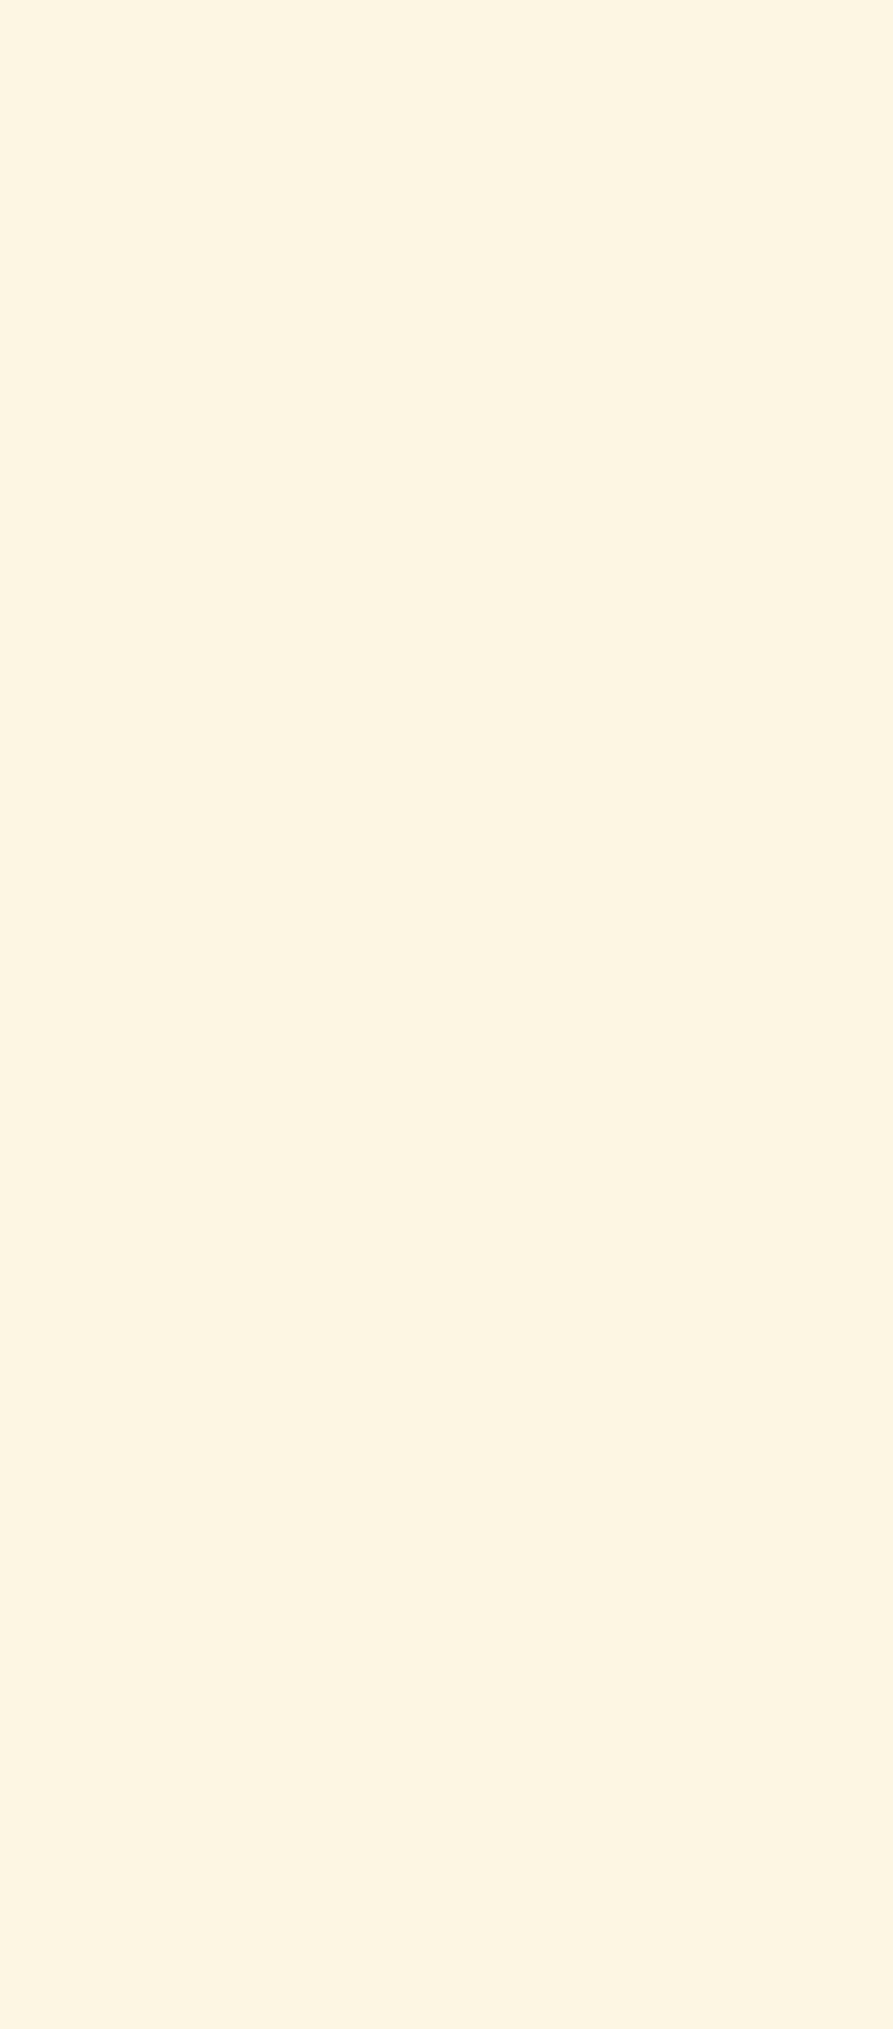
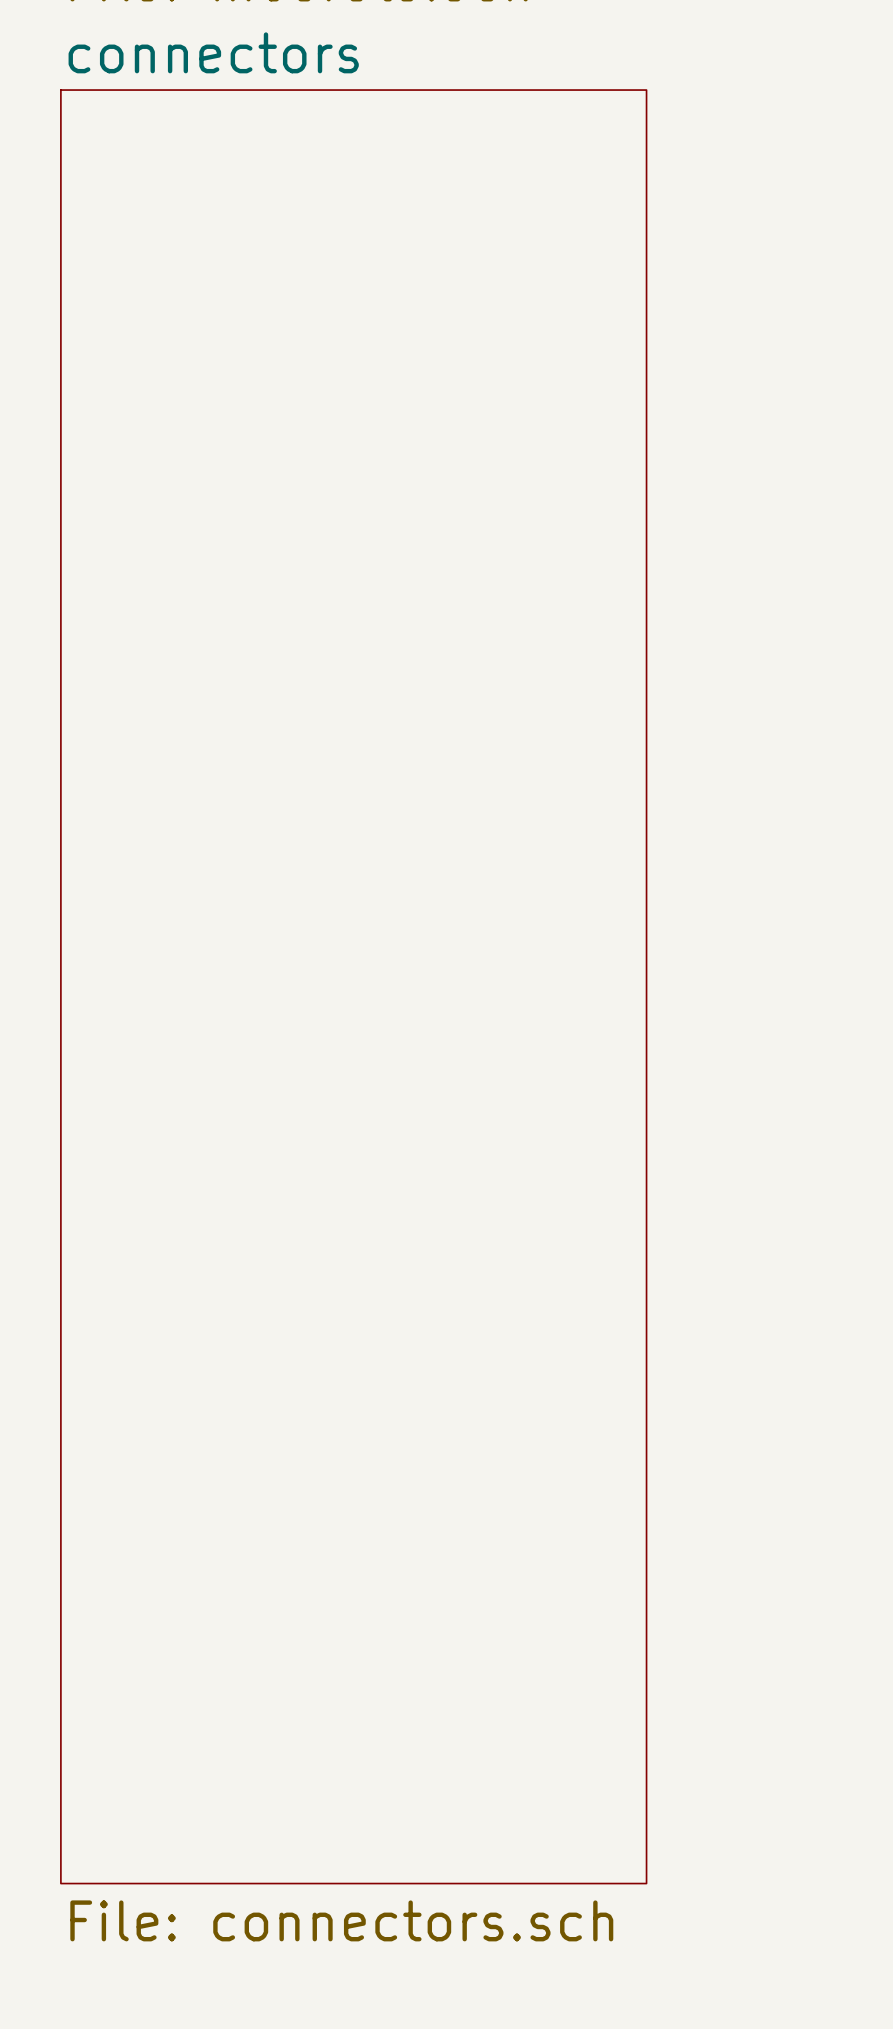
sheet connectors: none -> File: connectors.sch (353, 986)

